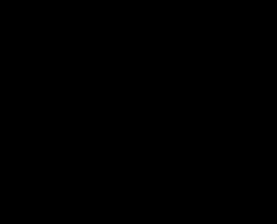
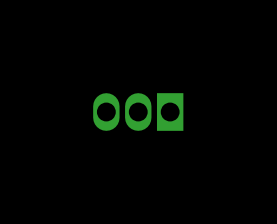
part: none -> (138, 112)

